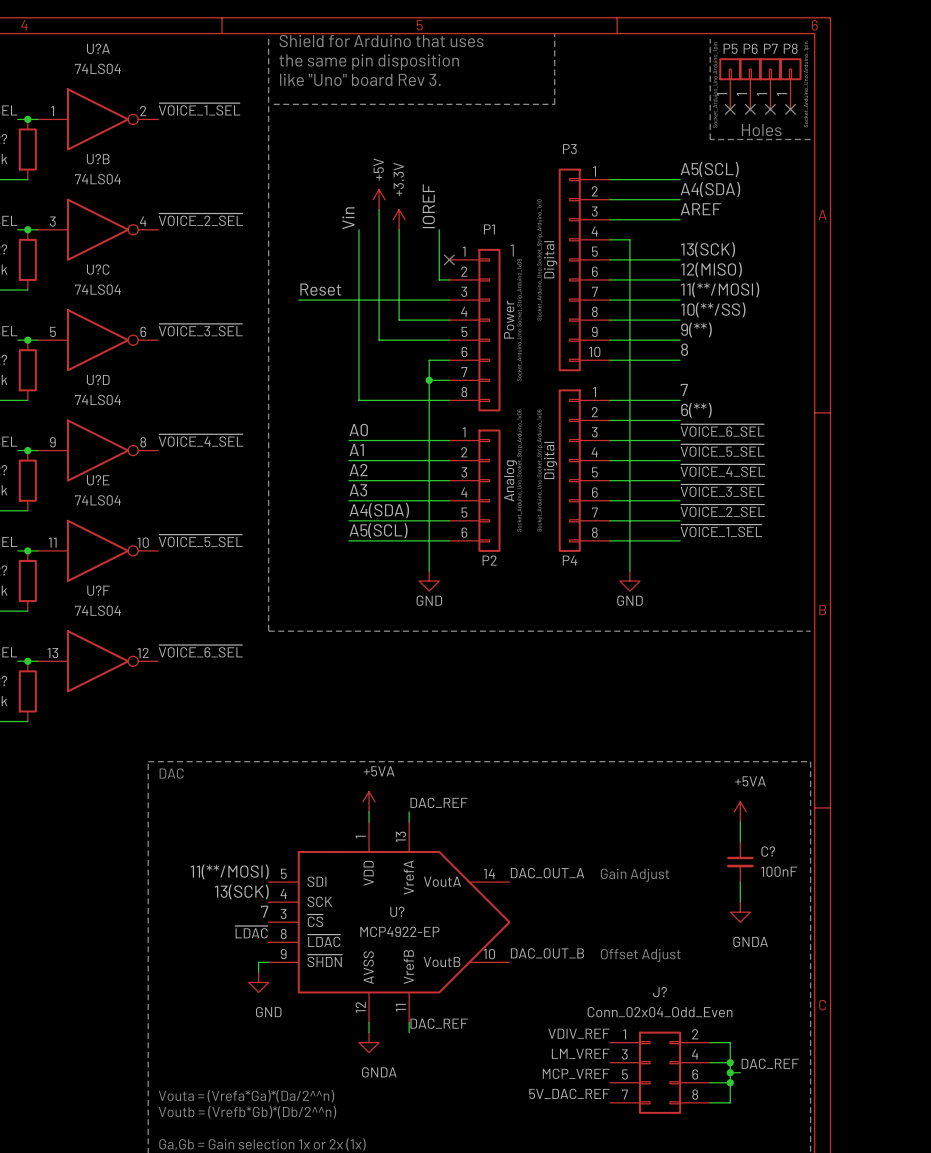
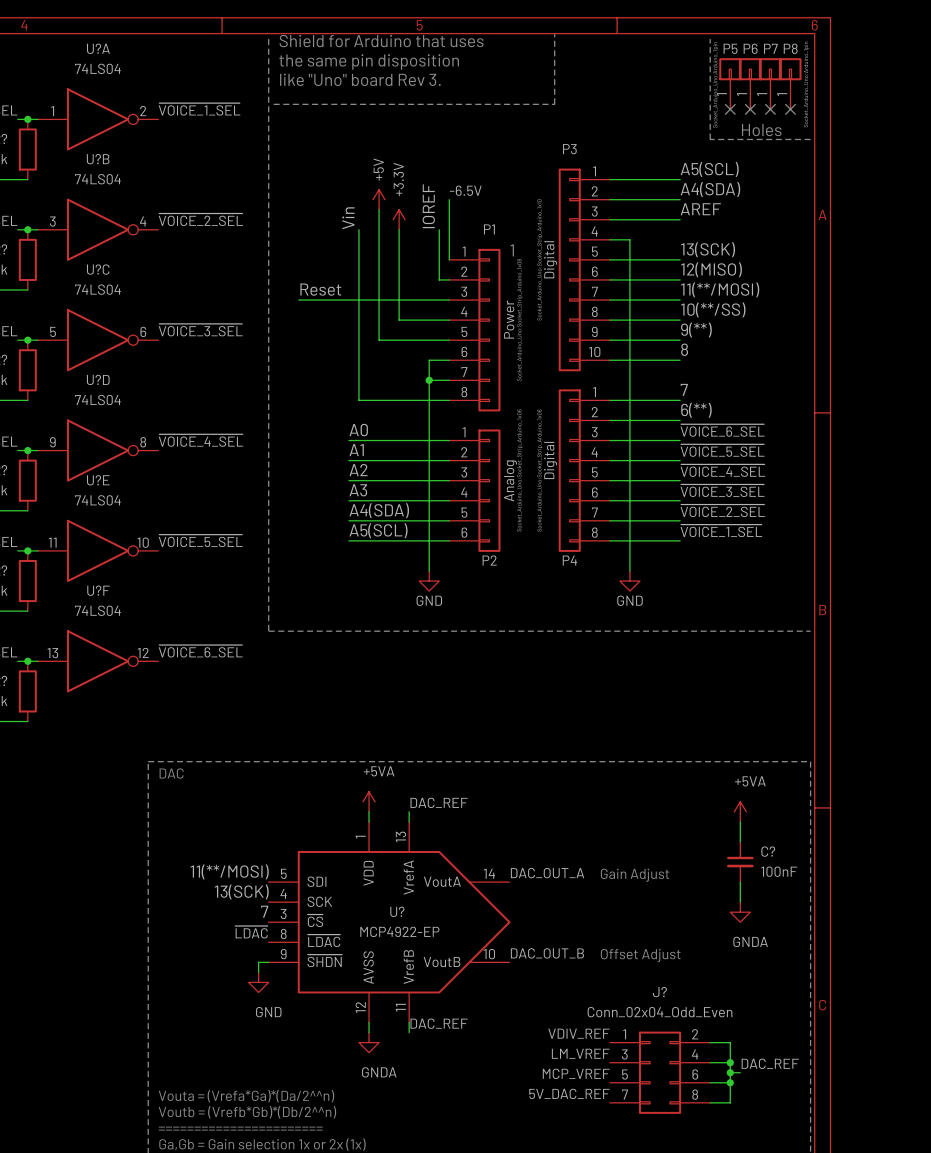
label: none -> -6.5V (465, 190)
wire: none -> (449, 199) (449, 259)
no-connect mark: (449, 259) -> none
text: none -> ======================= (240, 1128)

